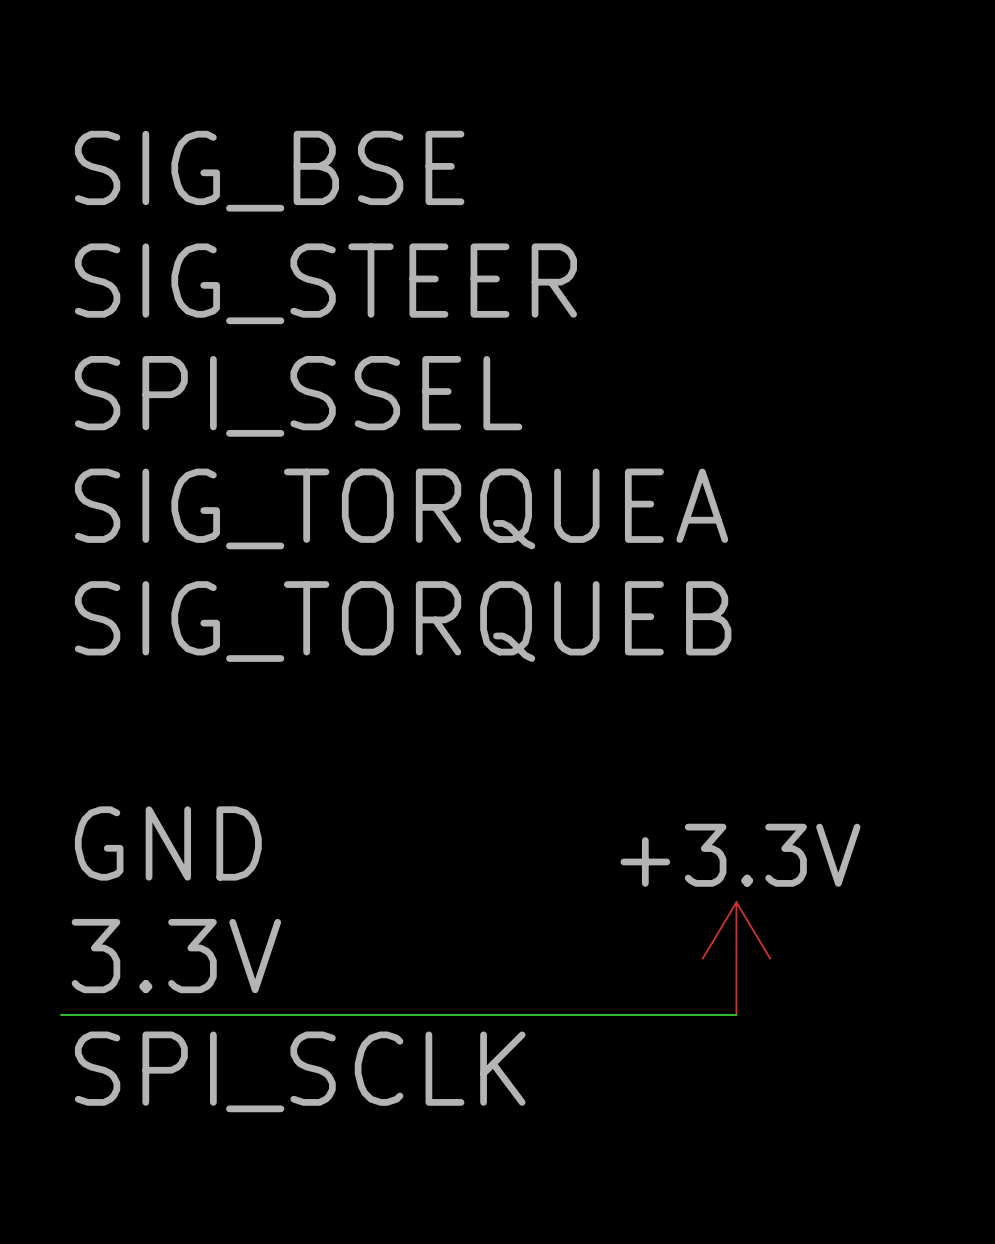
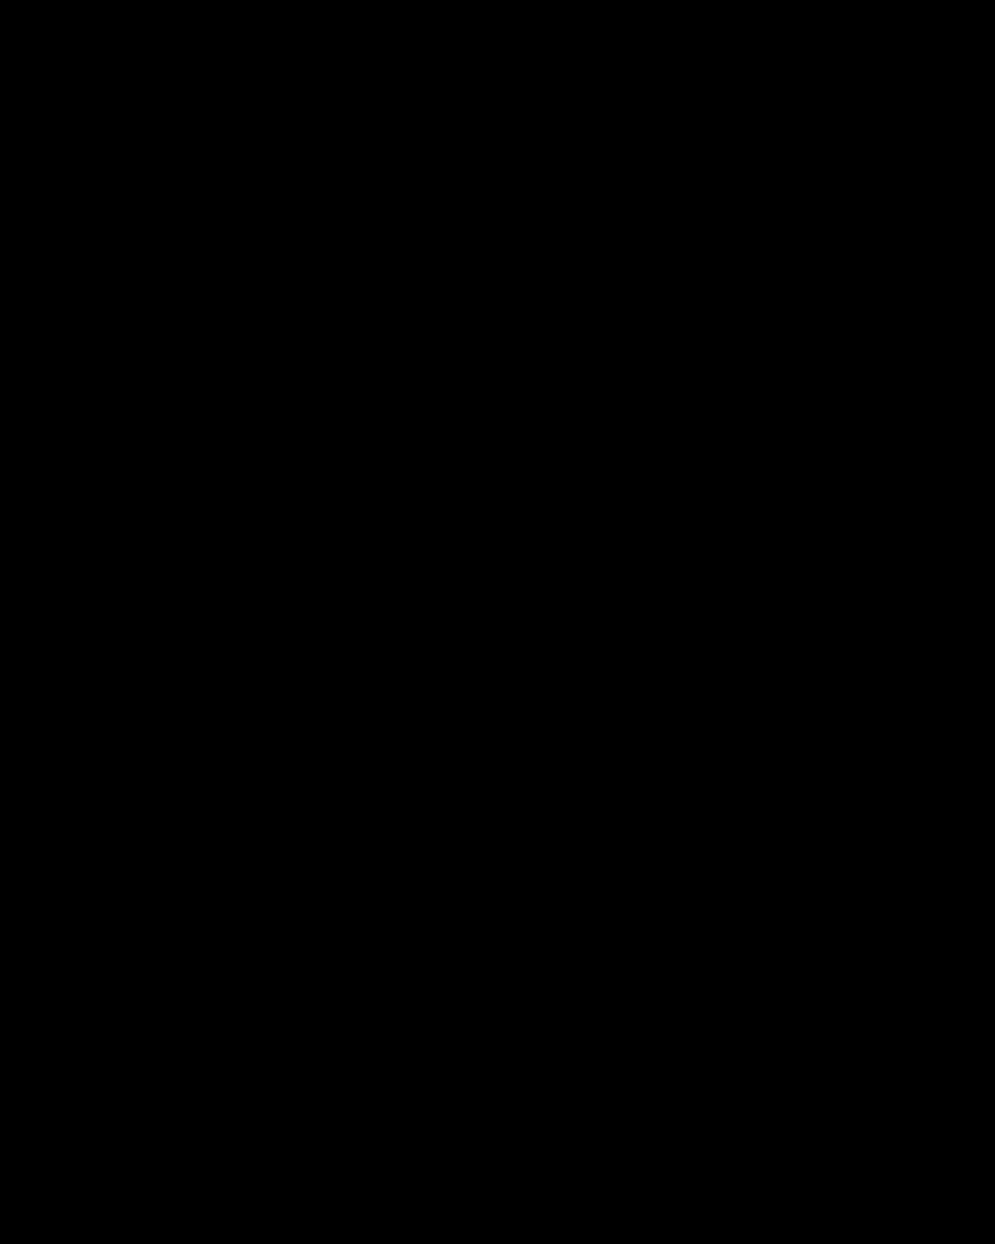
label: SIG_BSE (269, 171) -> none
label: SIG_STEER (325, 283) -> none
label: SPI_SSEL (298, 396) -> none
label: SIG_TORQUEA (401, 508) -> none
label: SIG_TORQUEB (403, 621) -> none
label: GND (168, 843) -> none
label: 3.3V (176, 956) -> none
power symbol: +3.3V (736, 958) -> none
wire: (60, 1014) (736, 1014) -> none
label: SPI_SCLK (300, 1071) -> none

